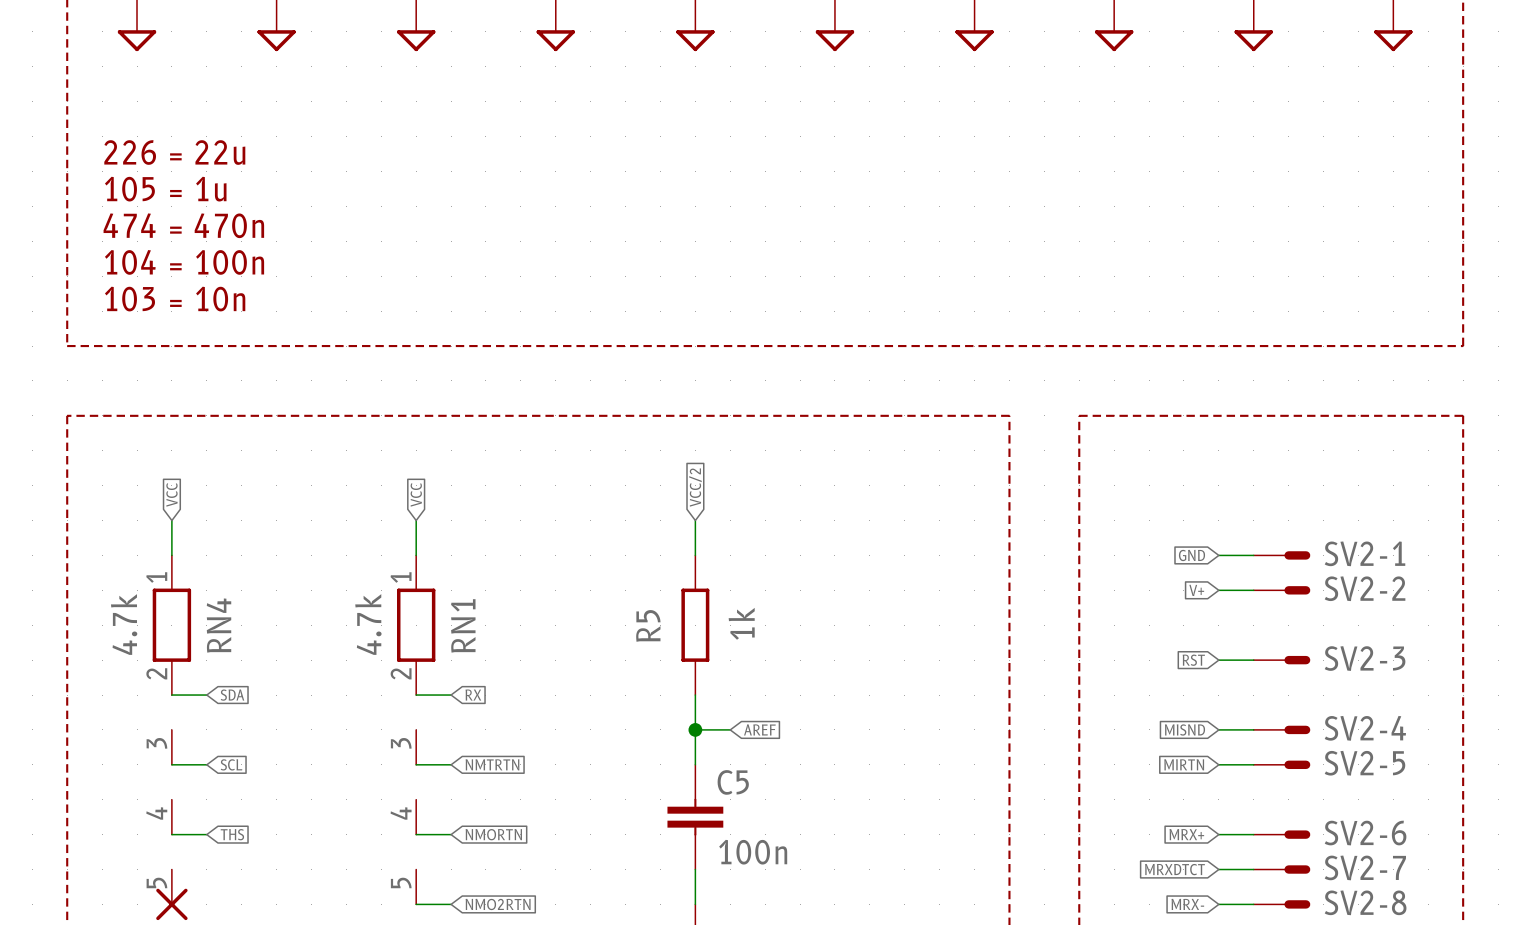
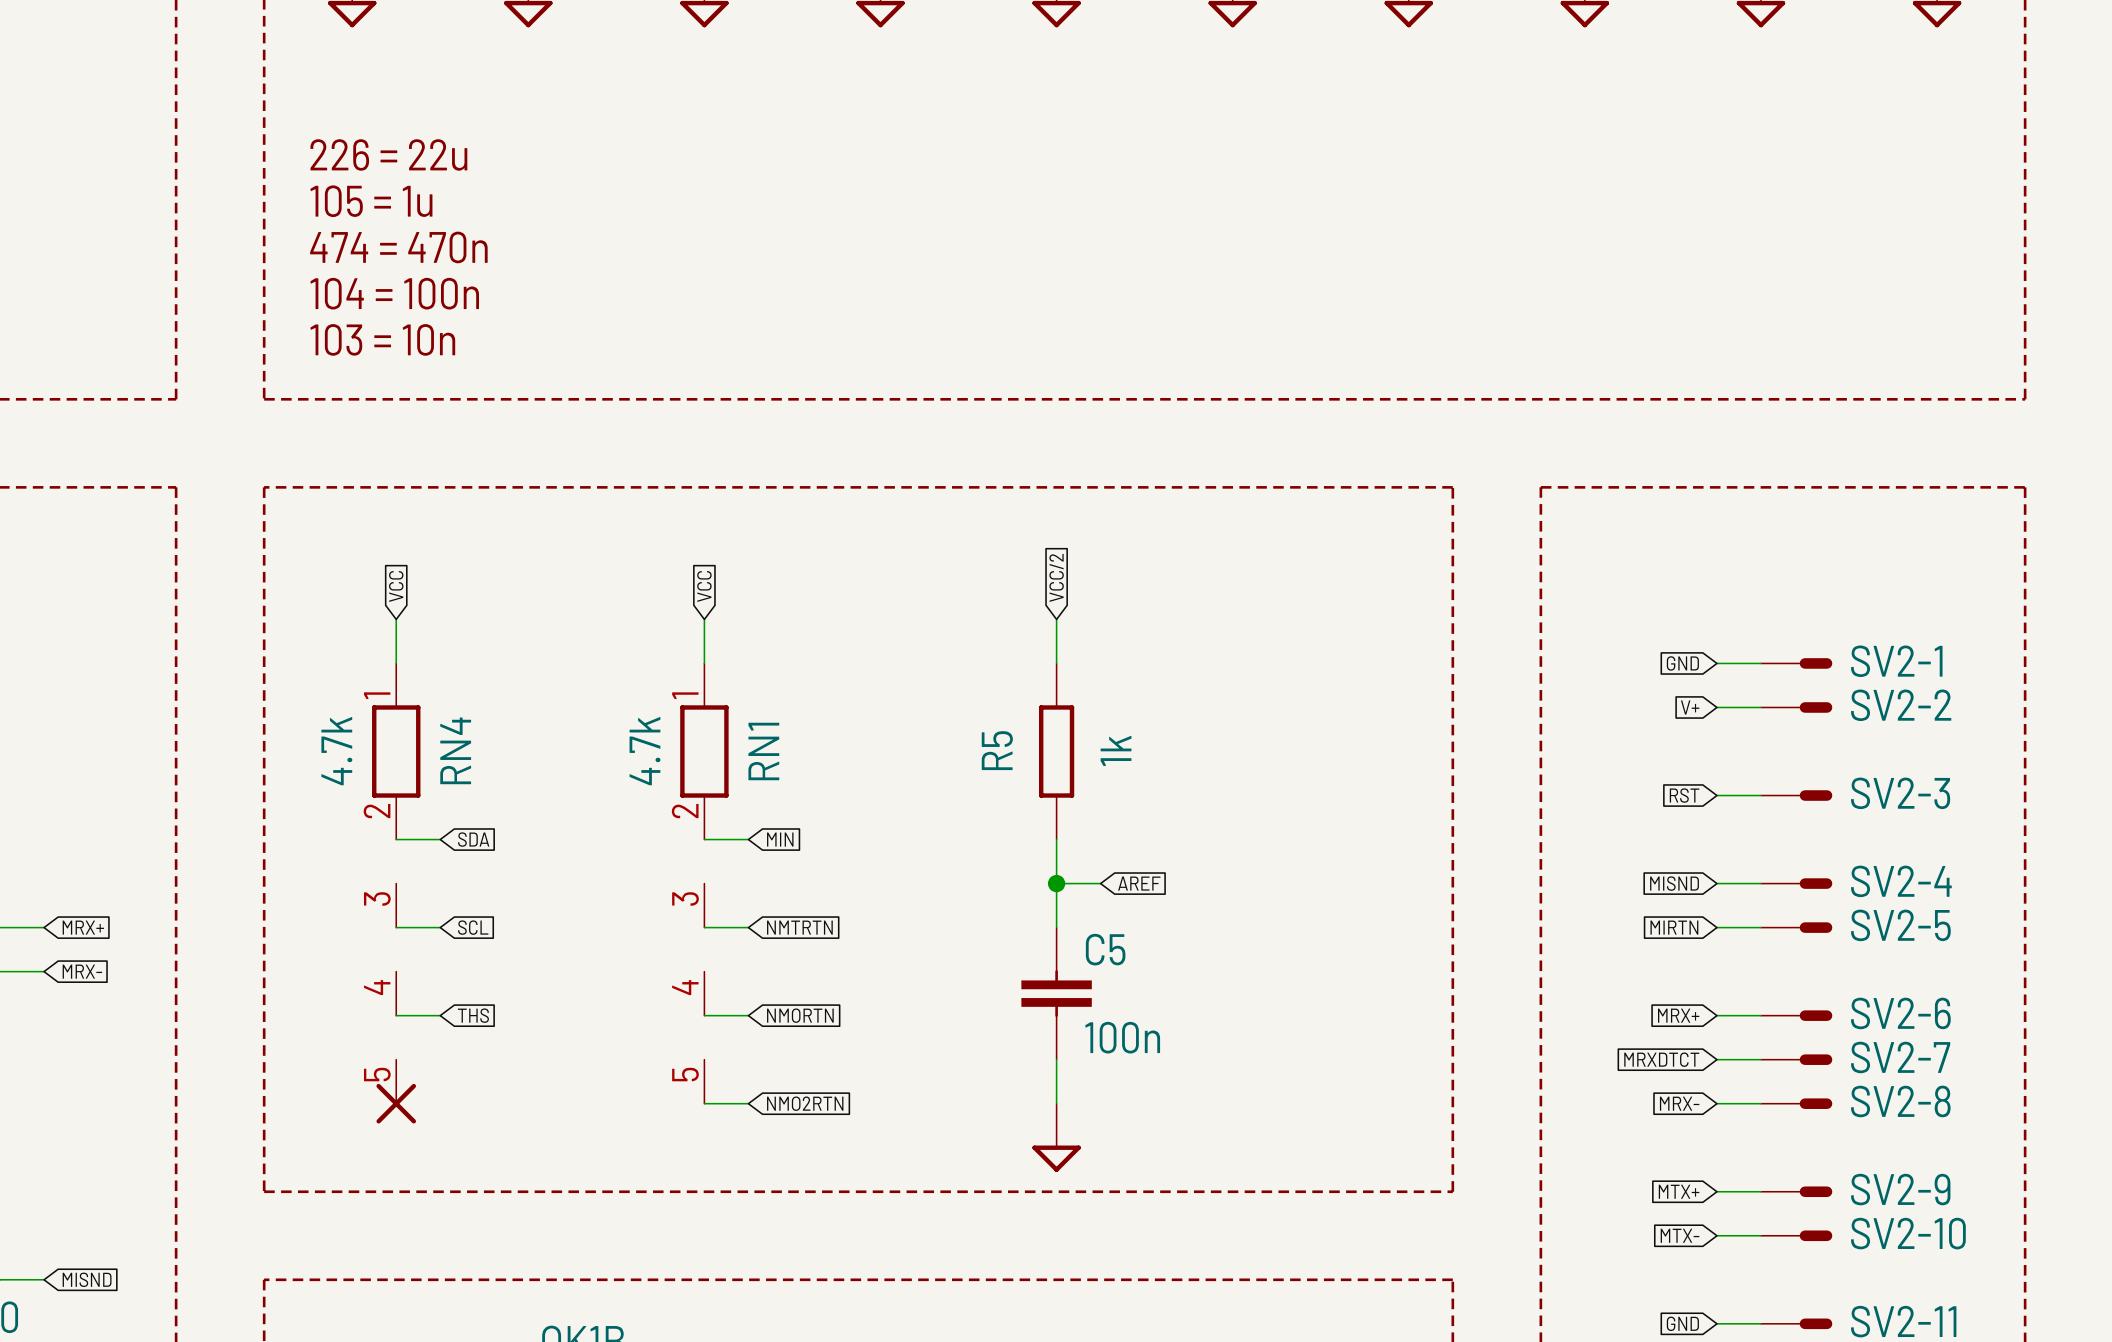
global label: RX (473, 695) -> MIN (780, 839)

